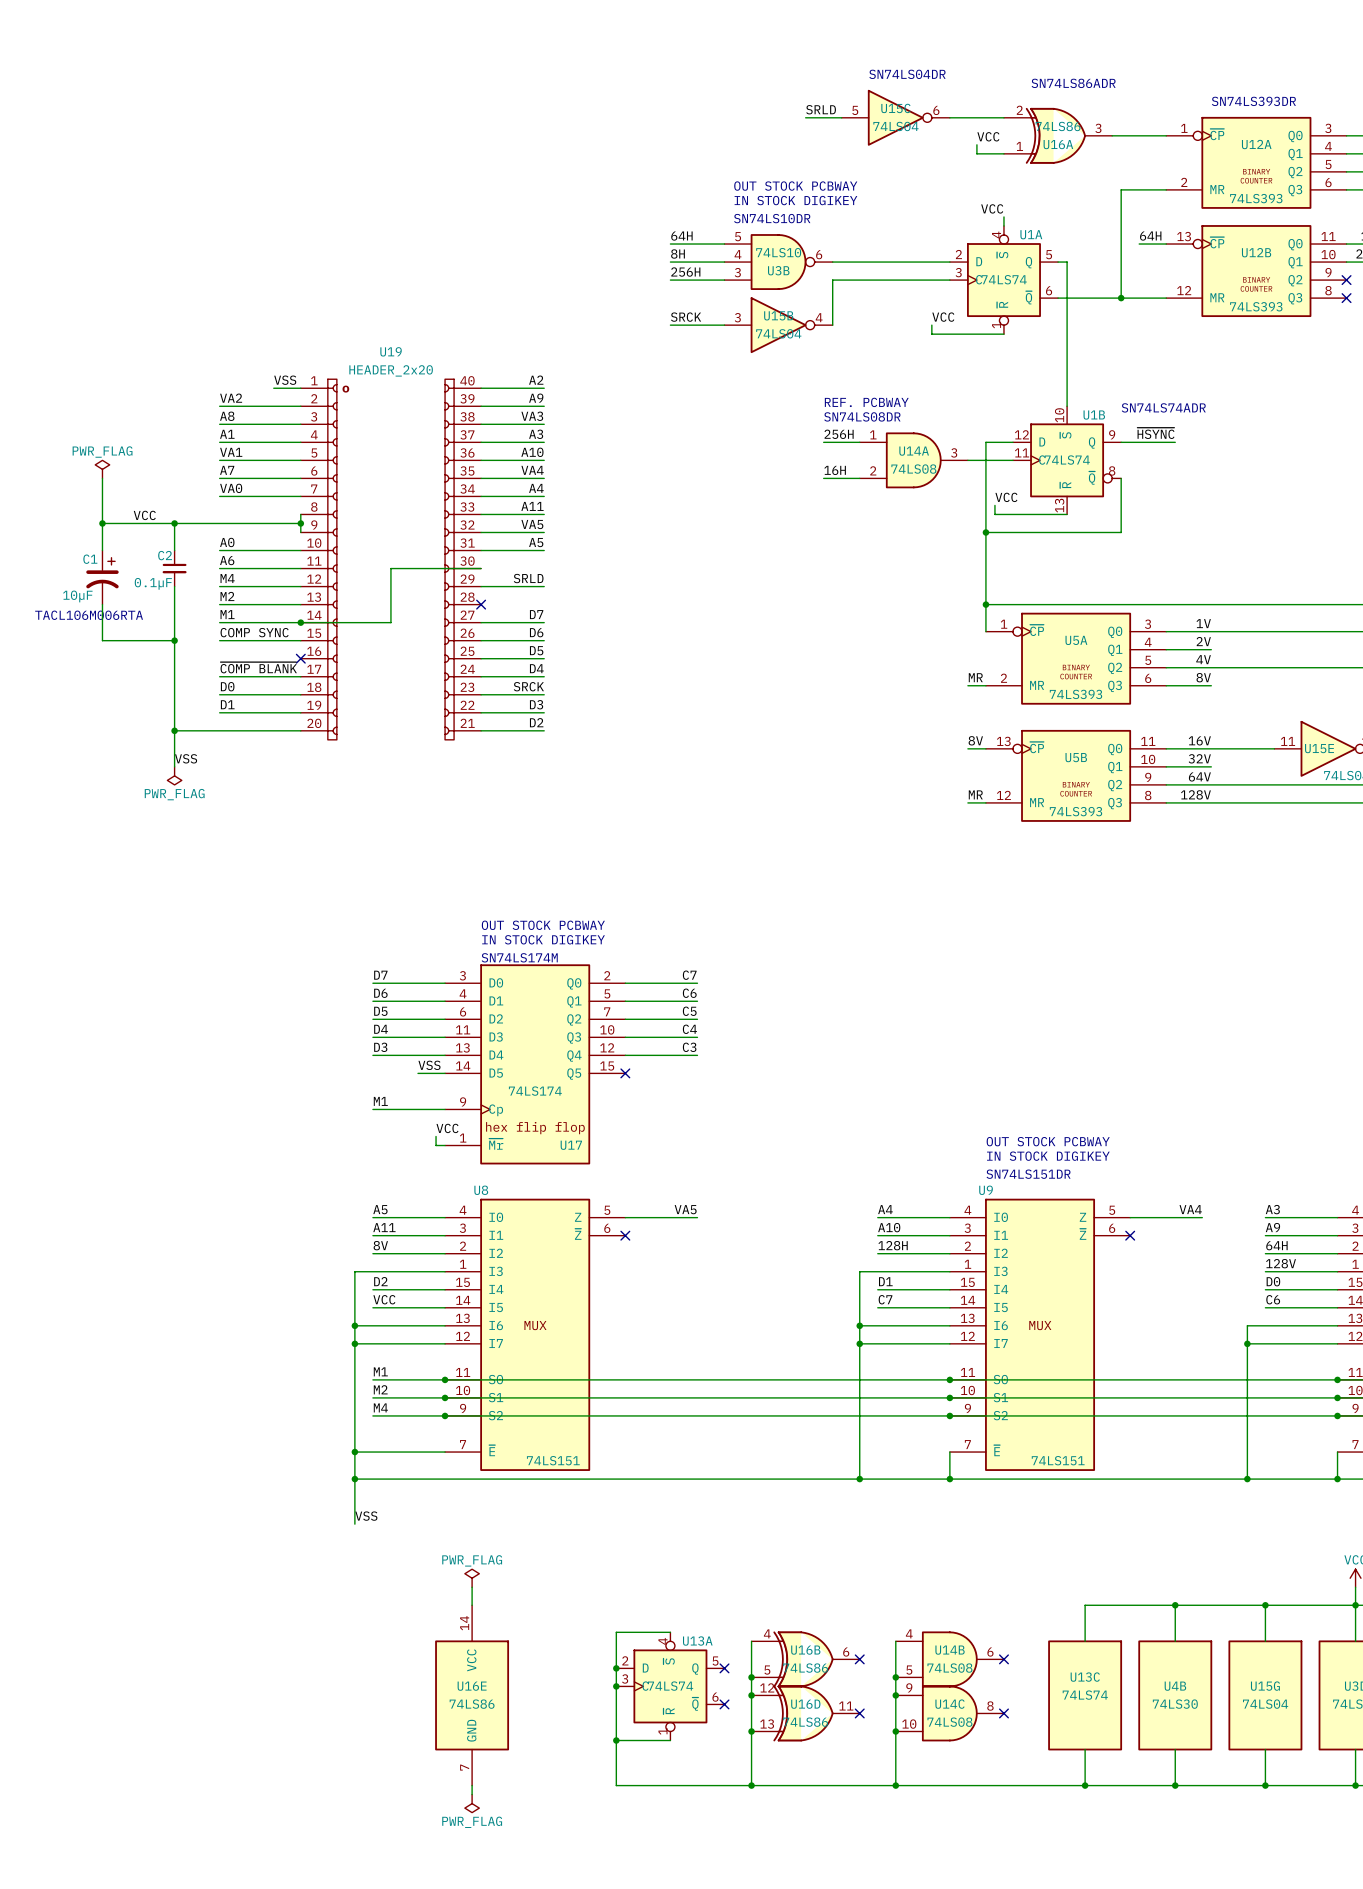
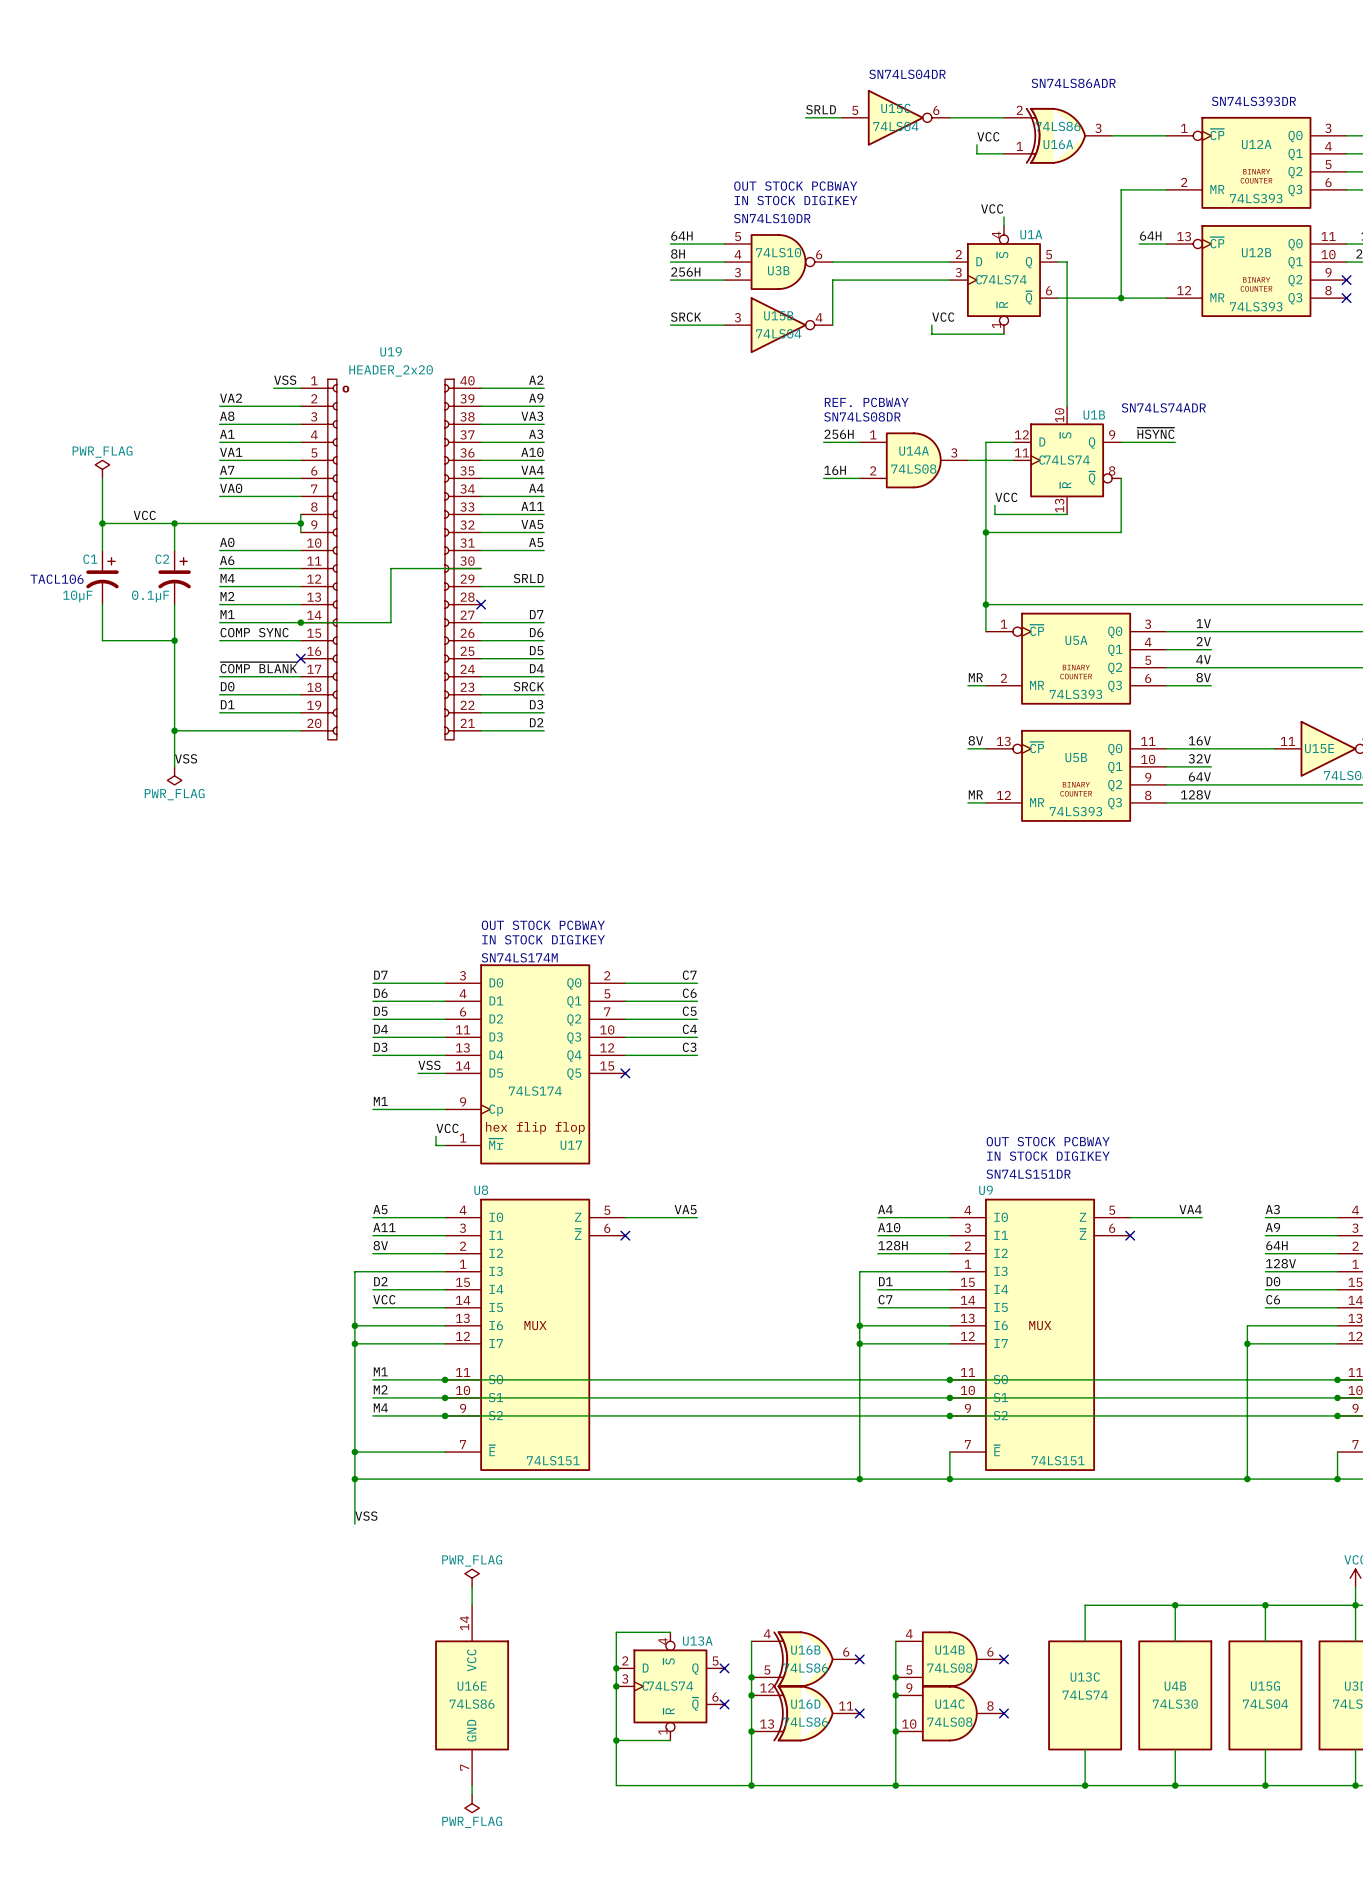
C2 symbol: [162, 550, 187, 587] -> [158, 550, 191, 605]
text: none -> TACL106 (57, 579)
text: TACL106M006RTA (89, 615) -> none

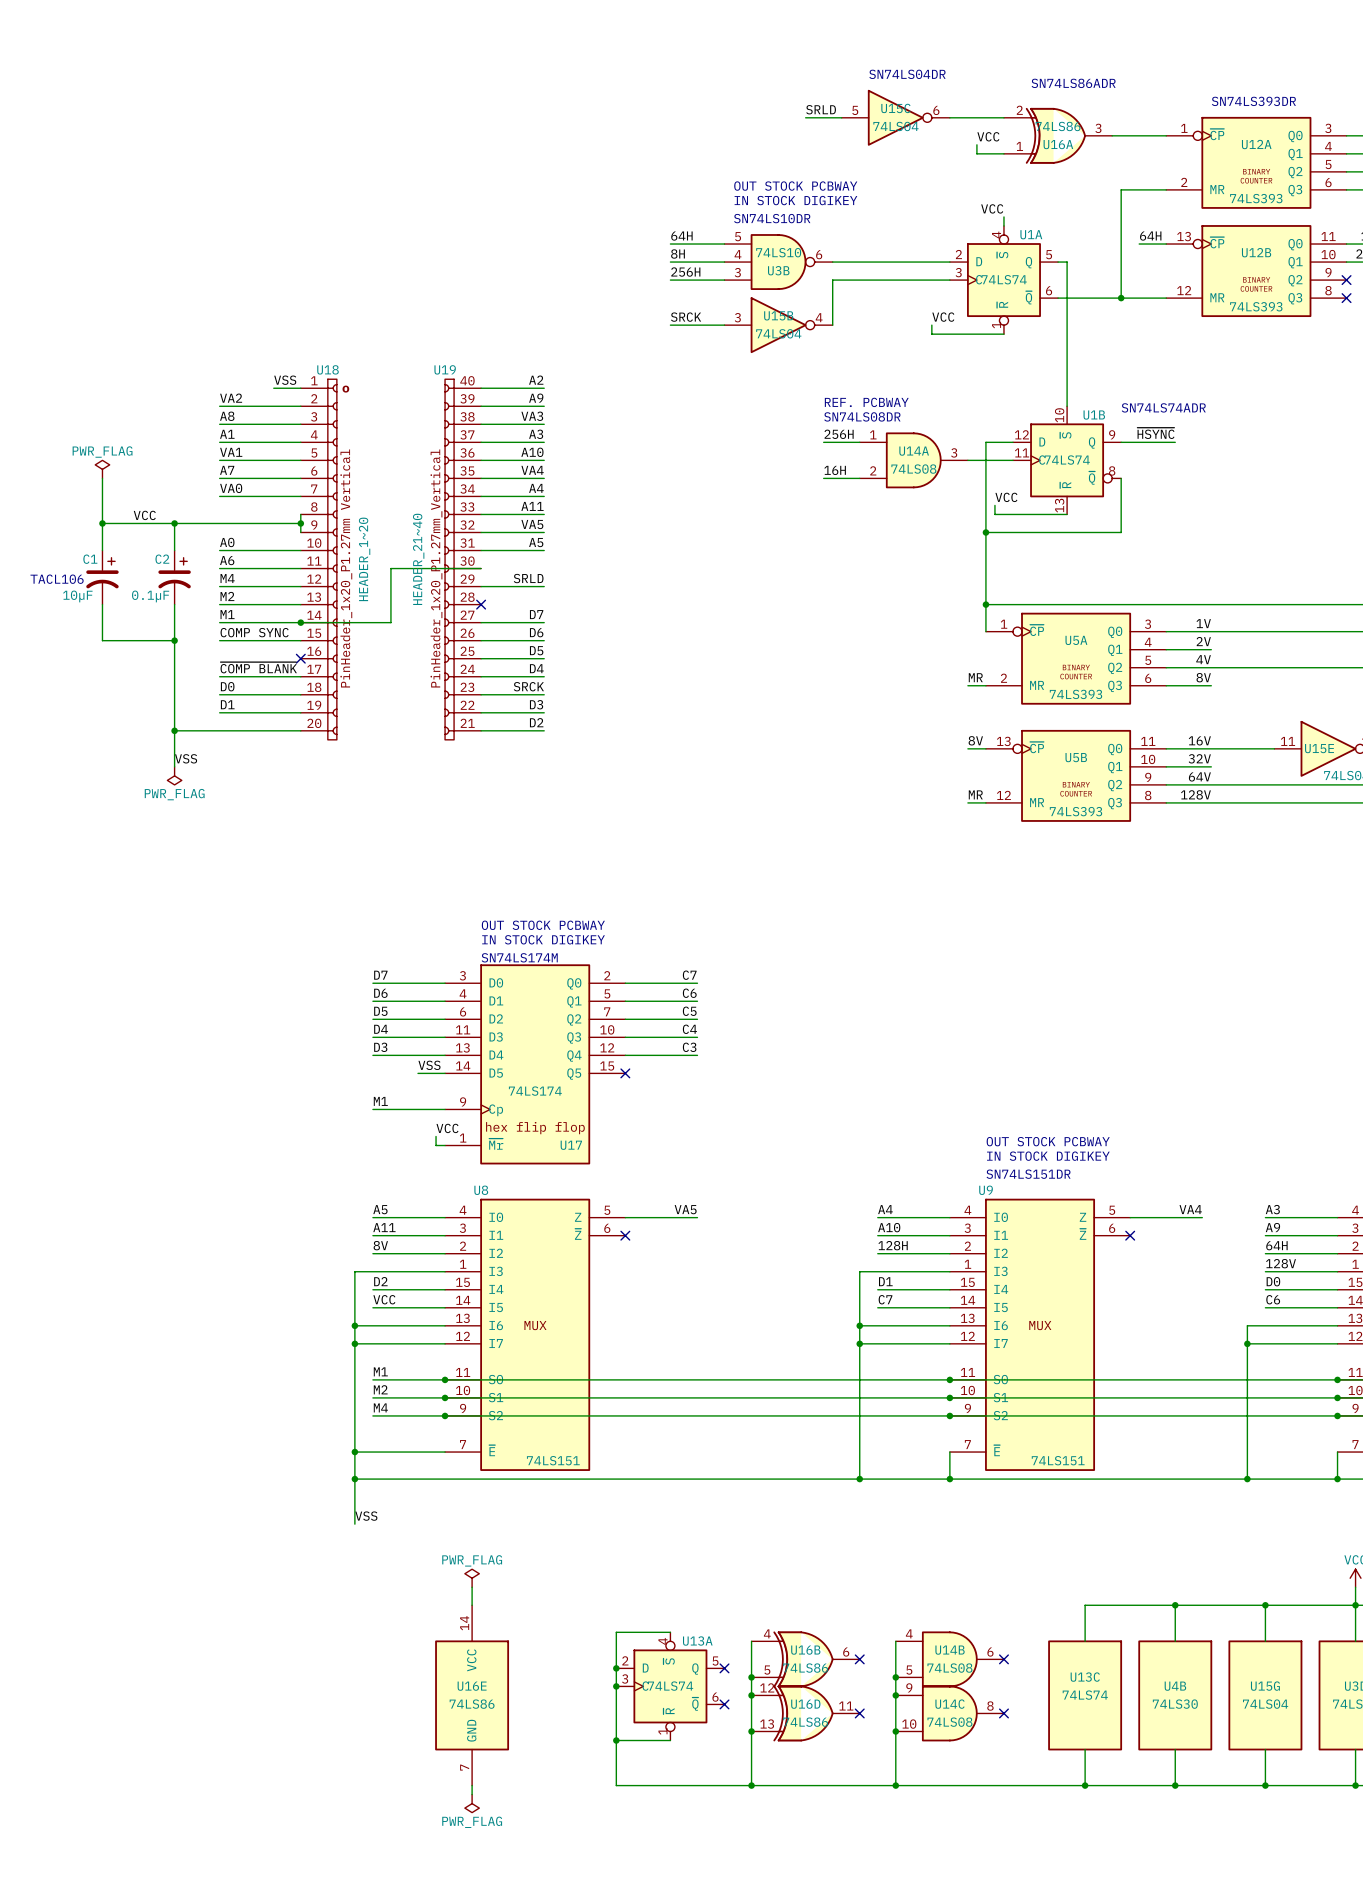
U19 name position: U19 (391, 351) -> U19 (445, 369)
U19 value: HEADER_2x20 (391, 370) -> HEADER_21~40 (418, 559)
U19 symbol: [300, 379, 482, 740] -> [444, 379, 482, 740]
U18: none -> HEADER_1~20 (319, 559)

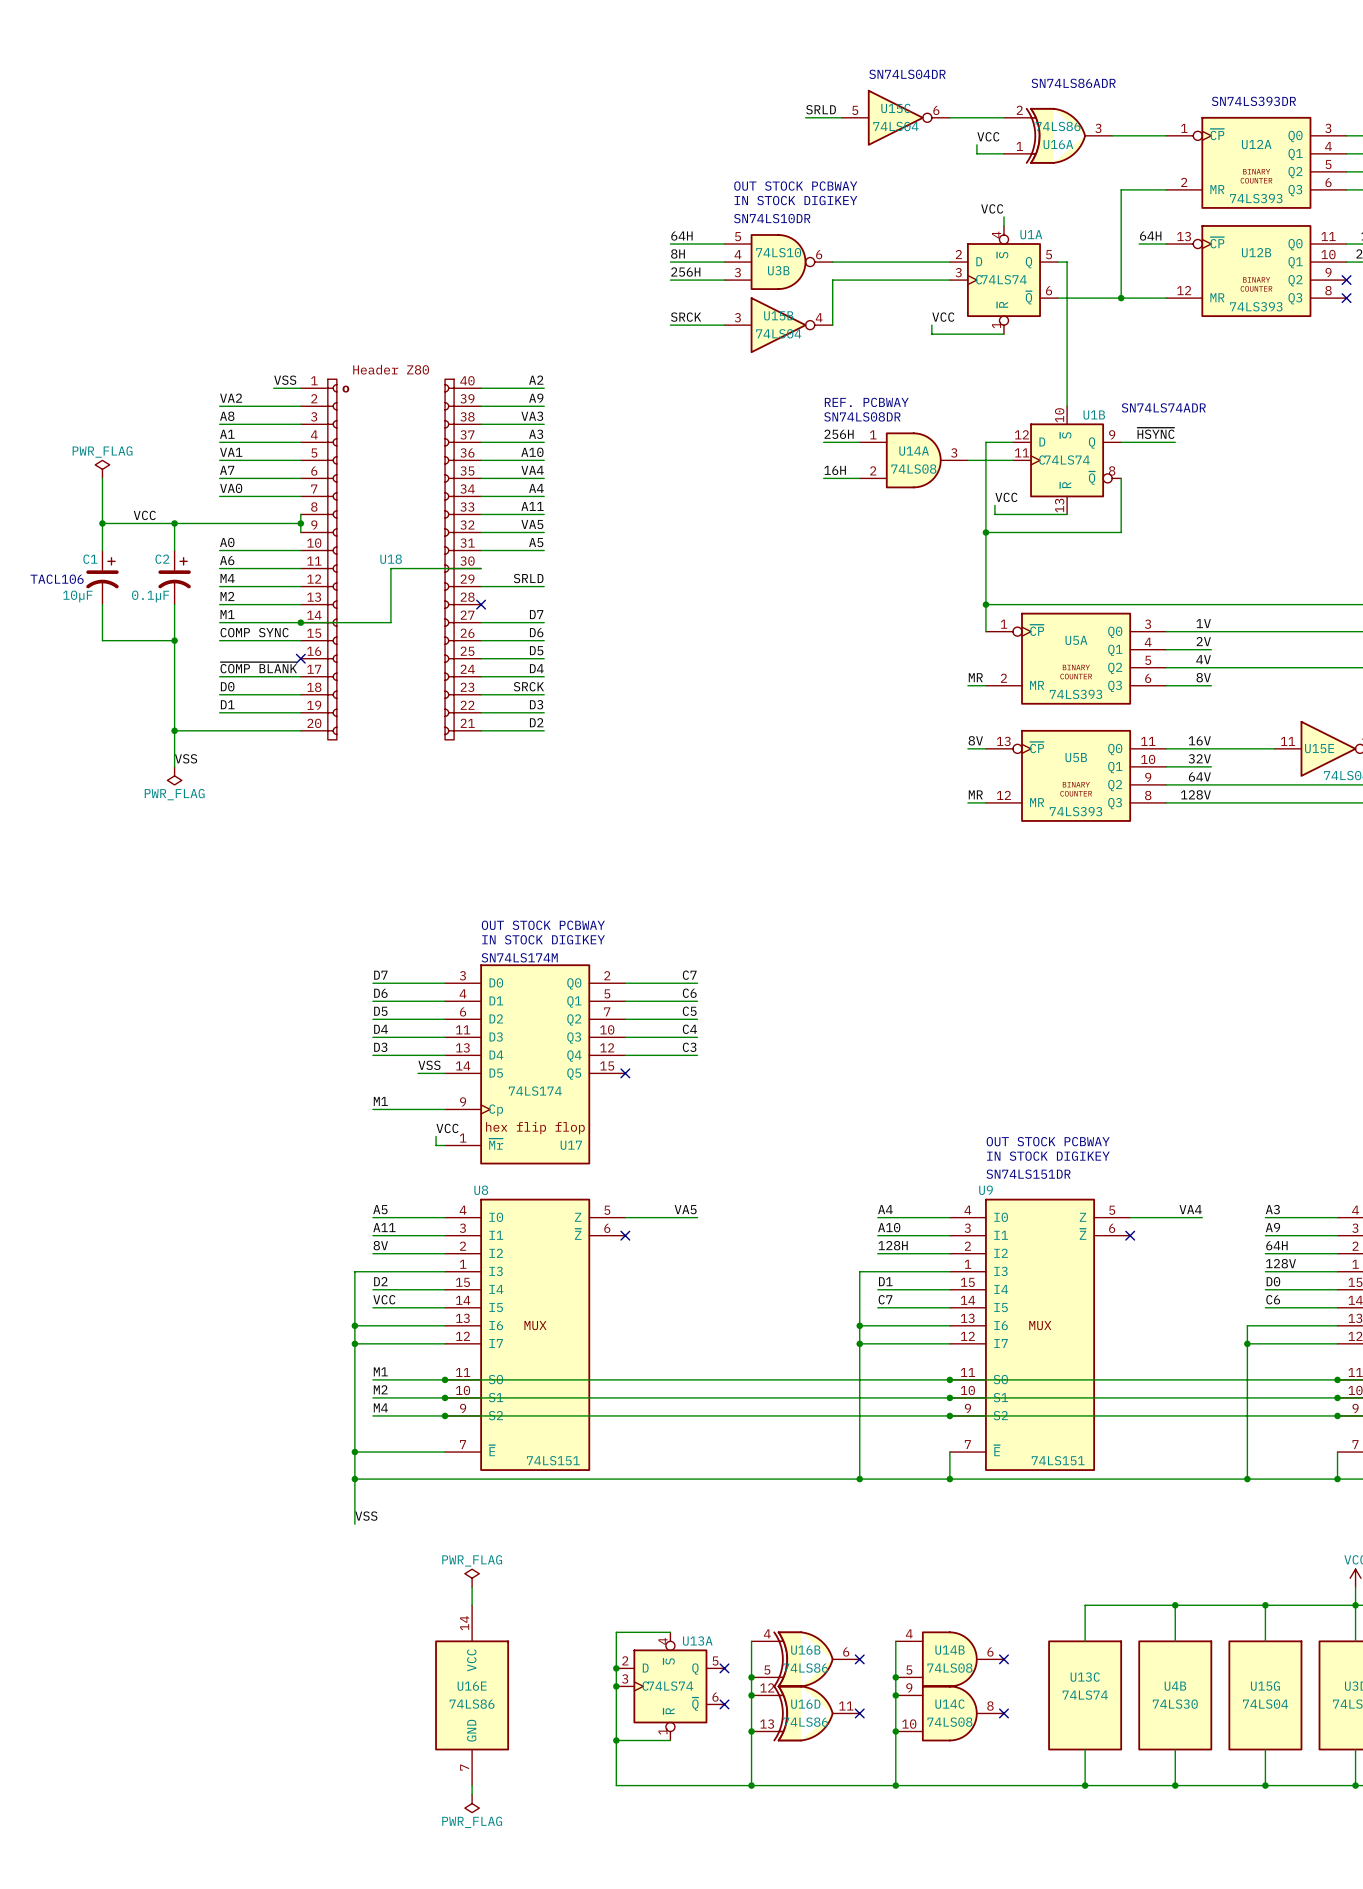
U18 name position: U18 (328, 369) -> U18 (391, 559)
U18 symbol: [300, 379, 338, 740] -> [300, 379, 482, 740]
U18 value: HEADER_1~20 (364, 559) -> none
U19: HEADER_21~40 (462, 559) -> none

